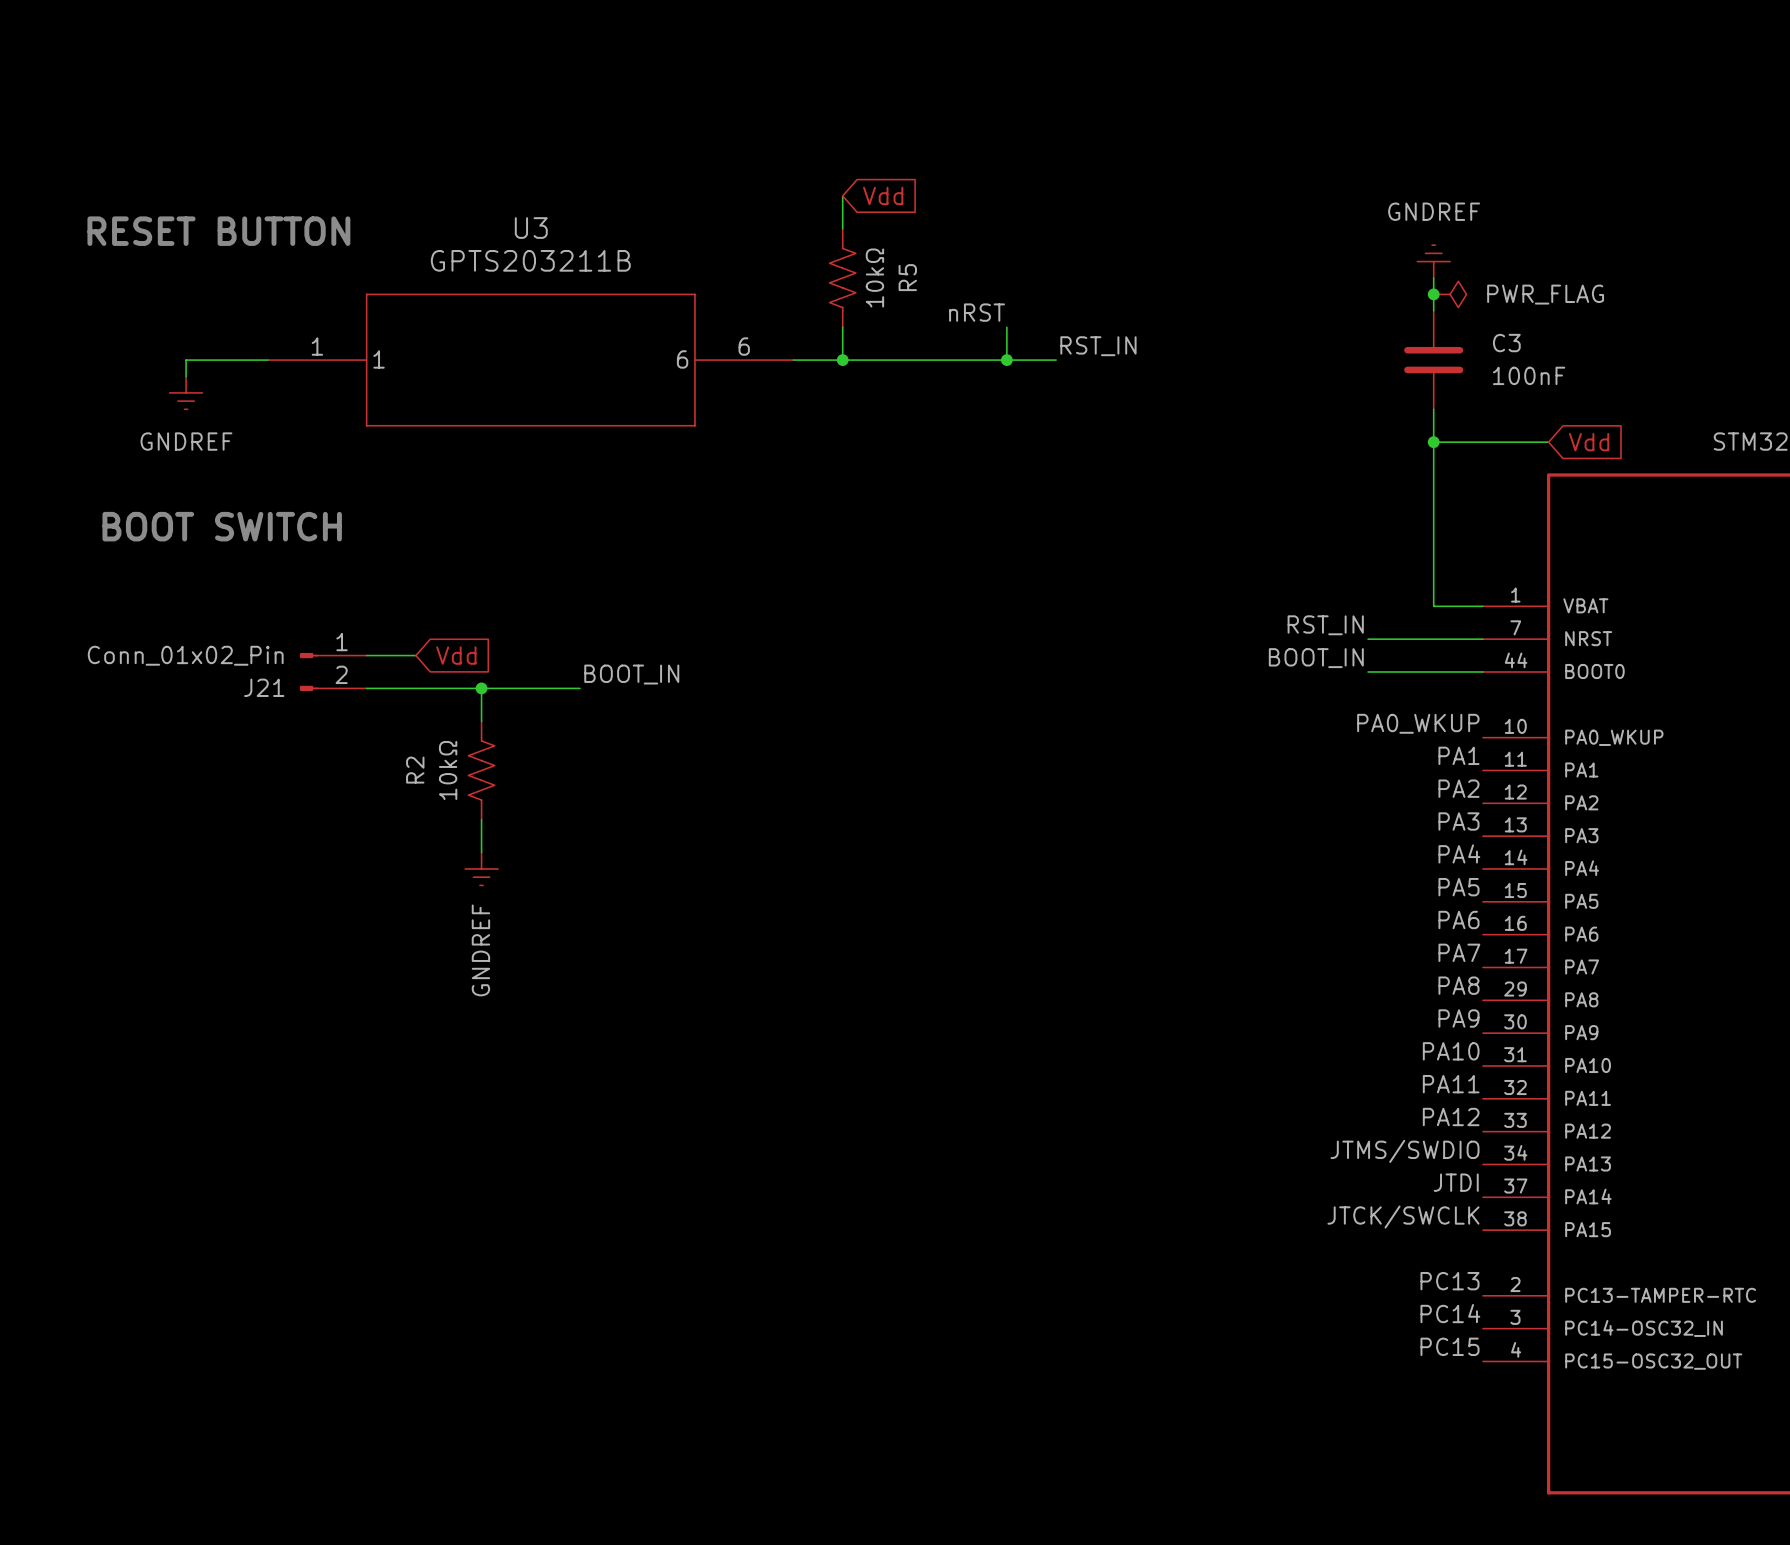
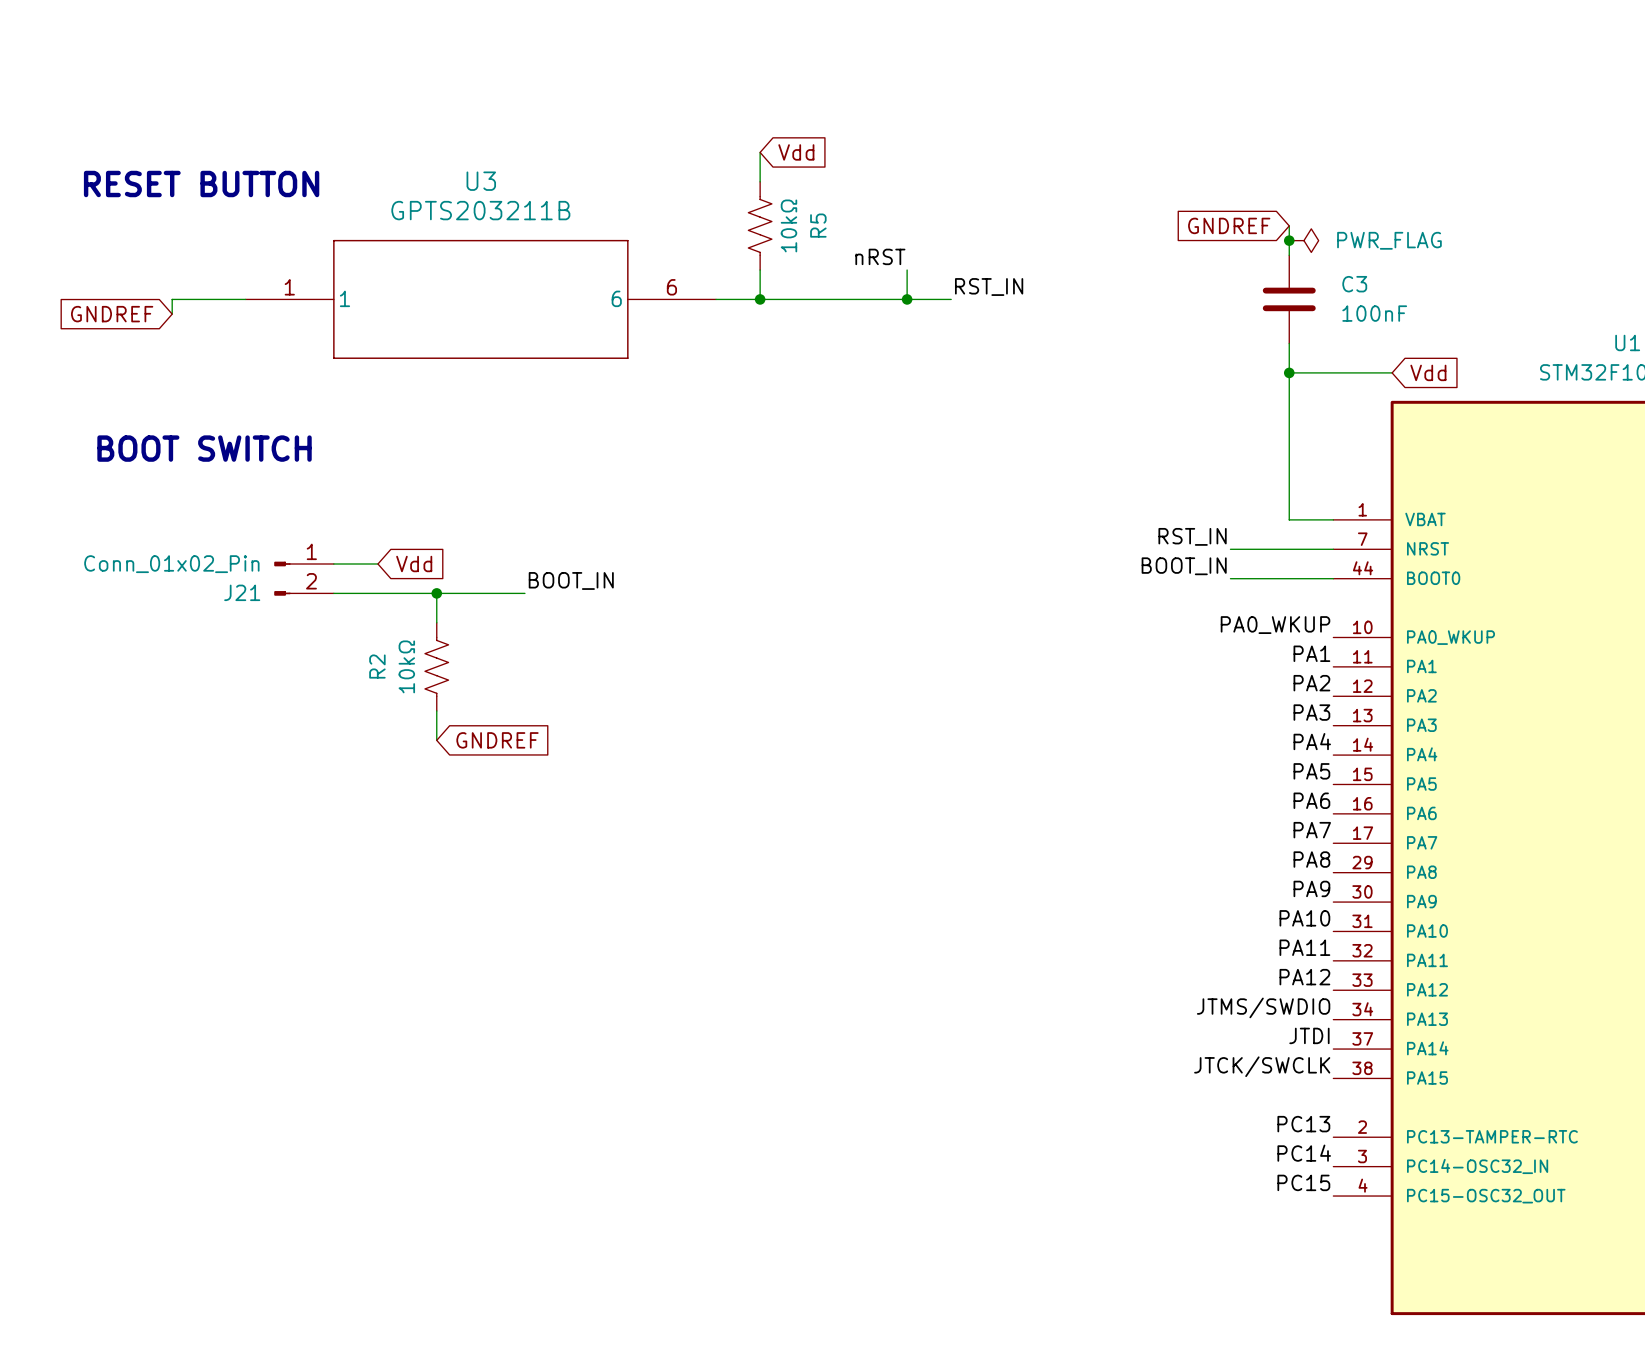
power symbol: GNDREF (1433, 261) -> none
global label: none -> GNDREF (1229, 225)
global label: none -> GNDREF (112, 314)
power symbol: GNDREF (186, 392) -> none
global label: none -> GNDREF (497, 740)
power symbol: GNDREF (481, 868) -> none

